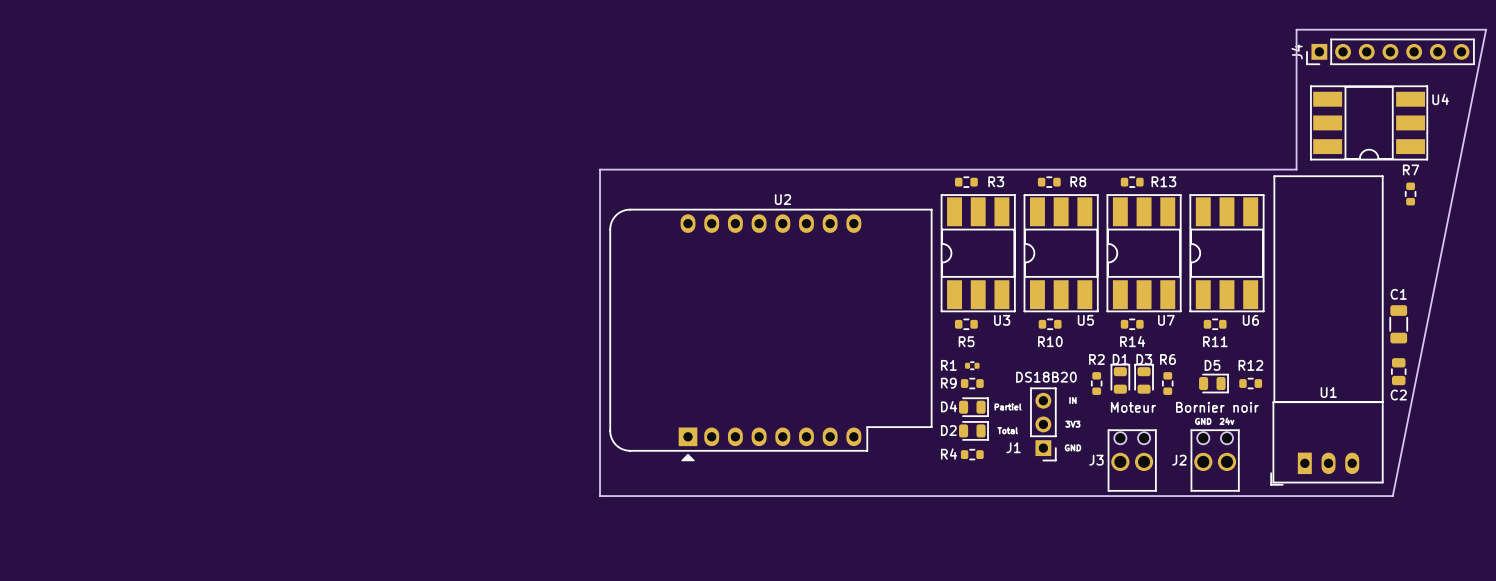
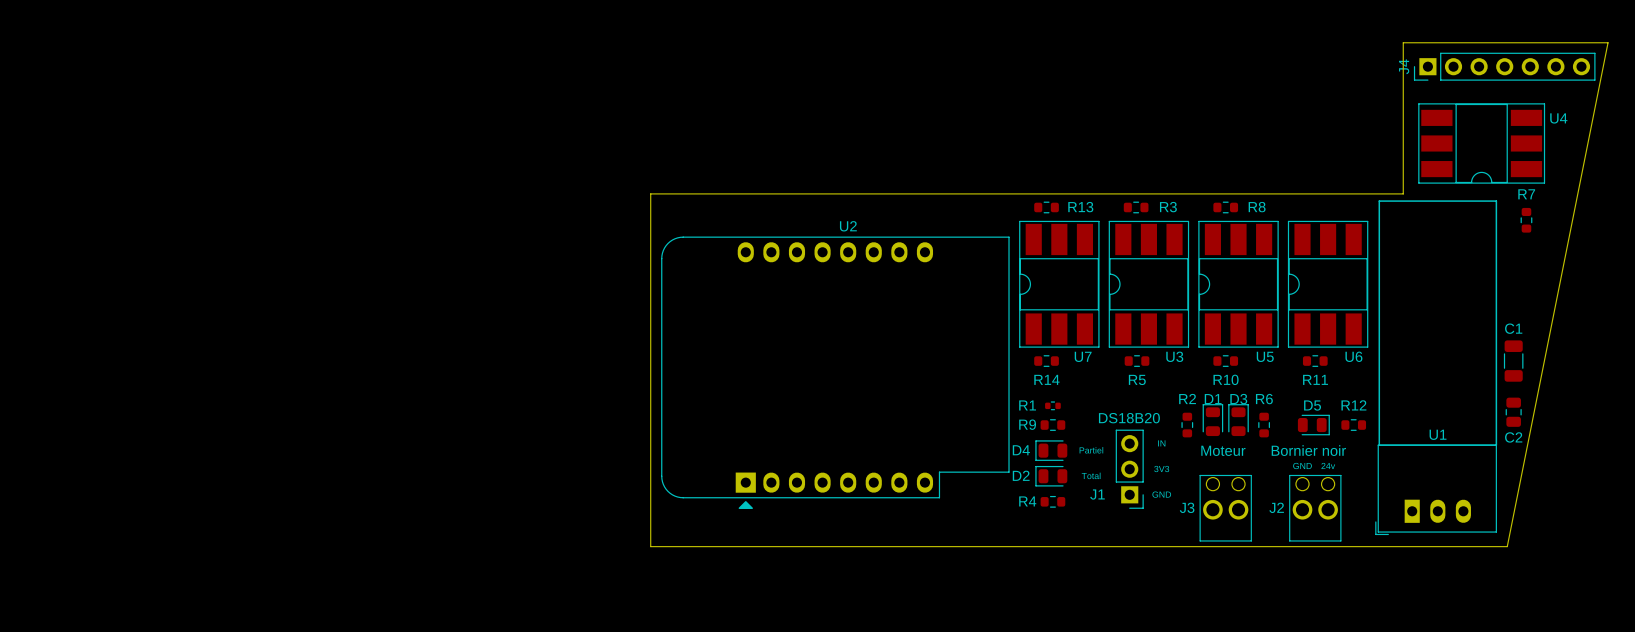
R3 name: R3 (996, 181) -> R13 (1080, 207)
R8 name: R8 (1078, 181) -> R3 (1168, 207)
R13 name: R13 (1163, 181) -> R8 (1257, 207)
U3 name: U3 (1002, 320) -> U7 (1083, 356)
U5 name: U5 (1085, 320) -> U3 (1174, 356)
U7 name: U7 (1166, 320) -> U5 (1265, 356)
R5 name: R5 (966, 341) -> R14 (1046, 379)
R10 name: R10 (1050, 341) -> R5 (1137, 379)
R14 name: R14 (1132, 341) -> R10 (1226, 379)
D4 rotation: 0° (973, 407) -> 180° (1051, 450)
D2 rotation: 0° (973, 430) -> 180° (1051, 476)

